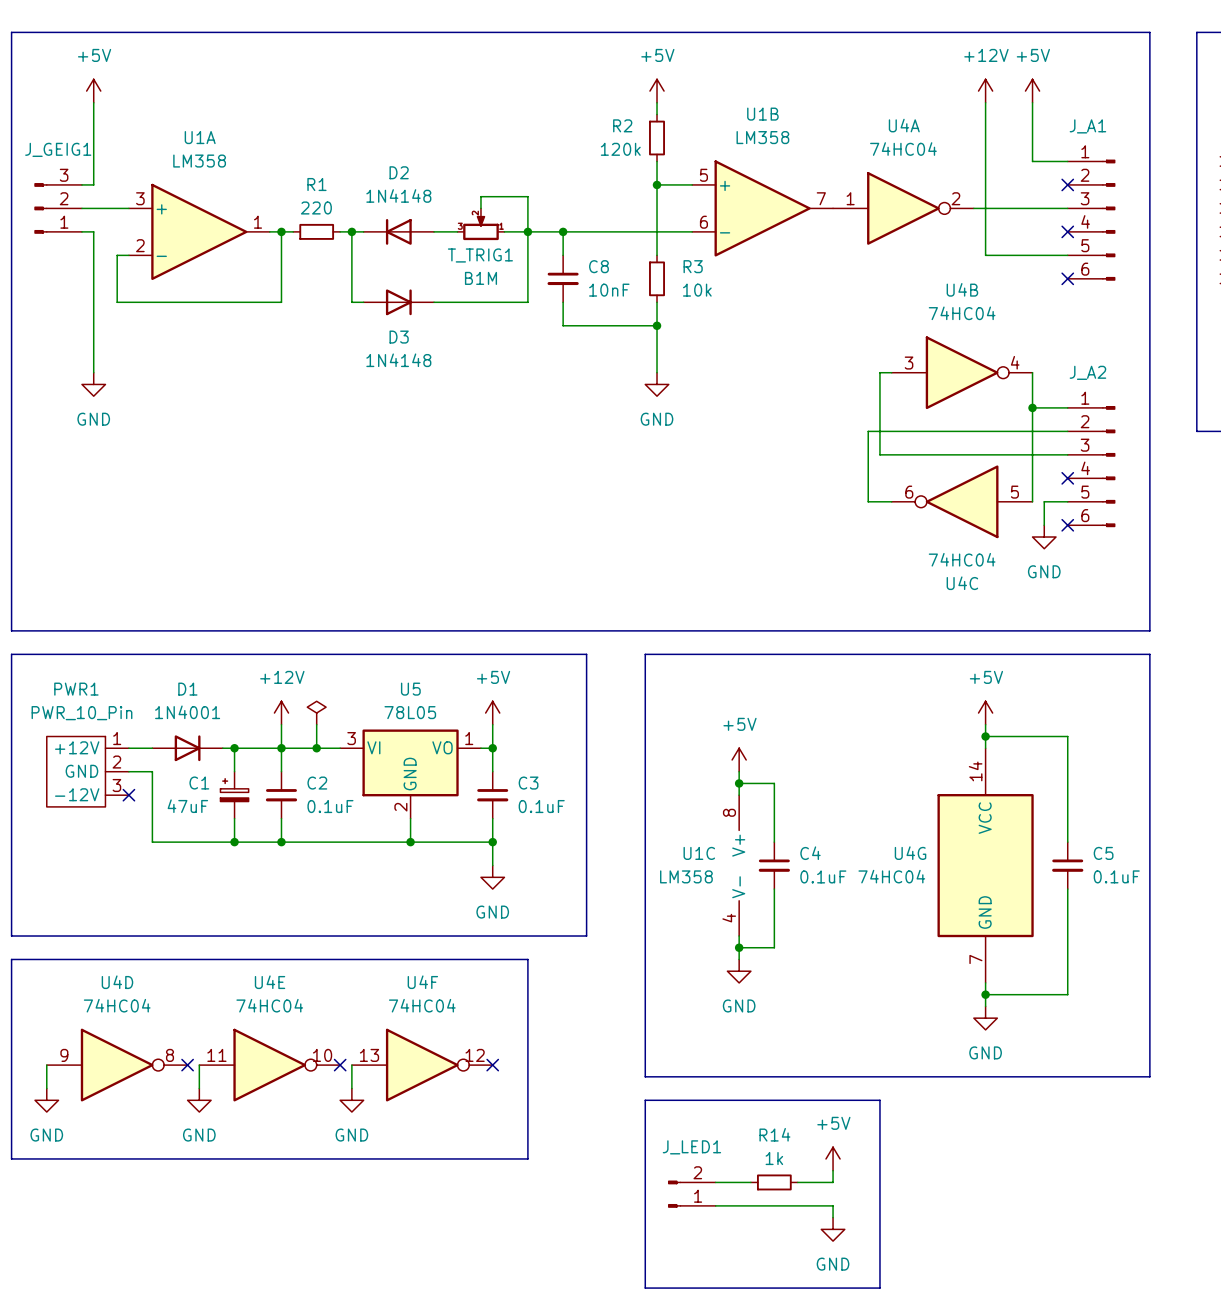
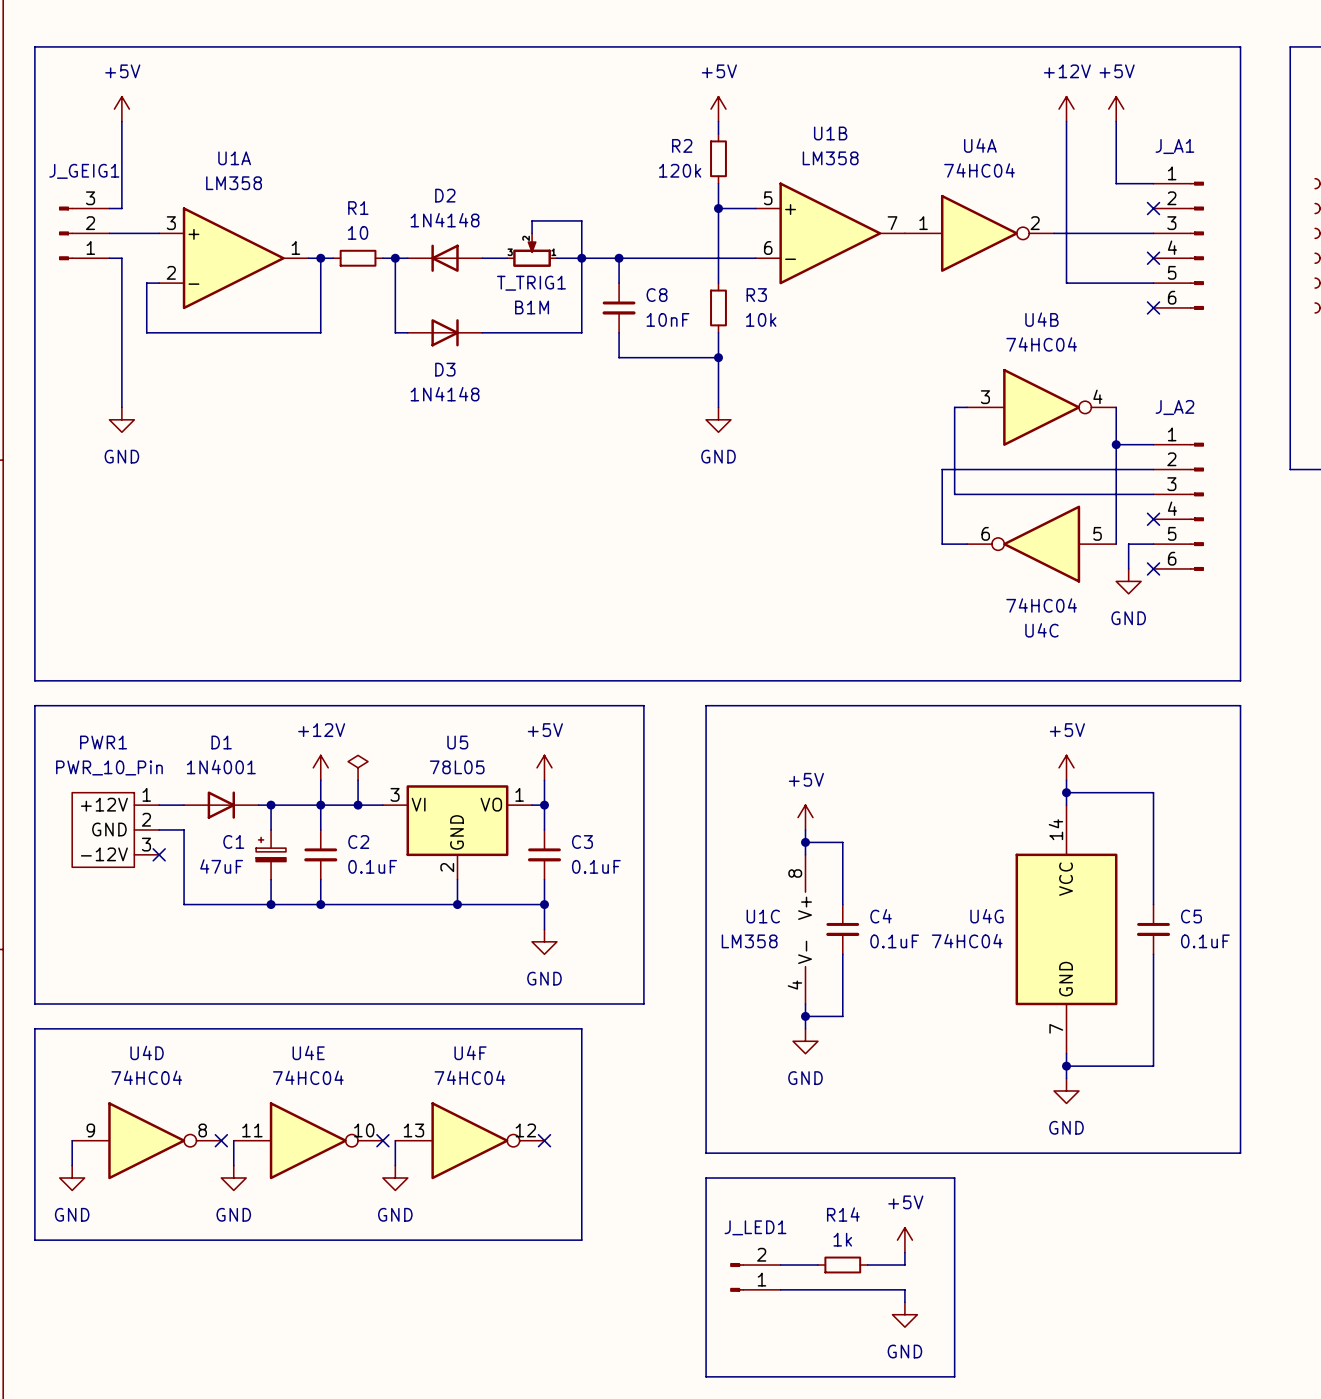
R1 value: 220 (316, 207) -> 10 (358, 232)

